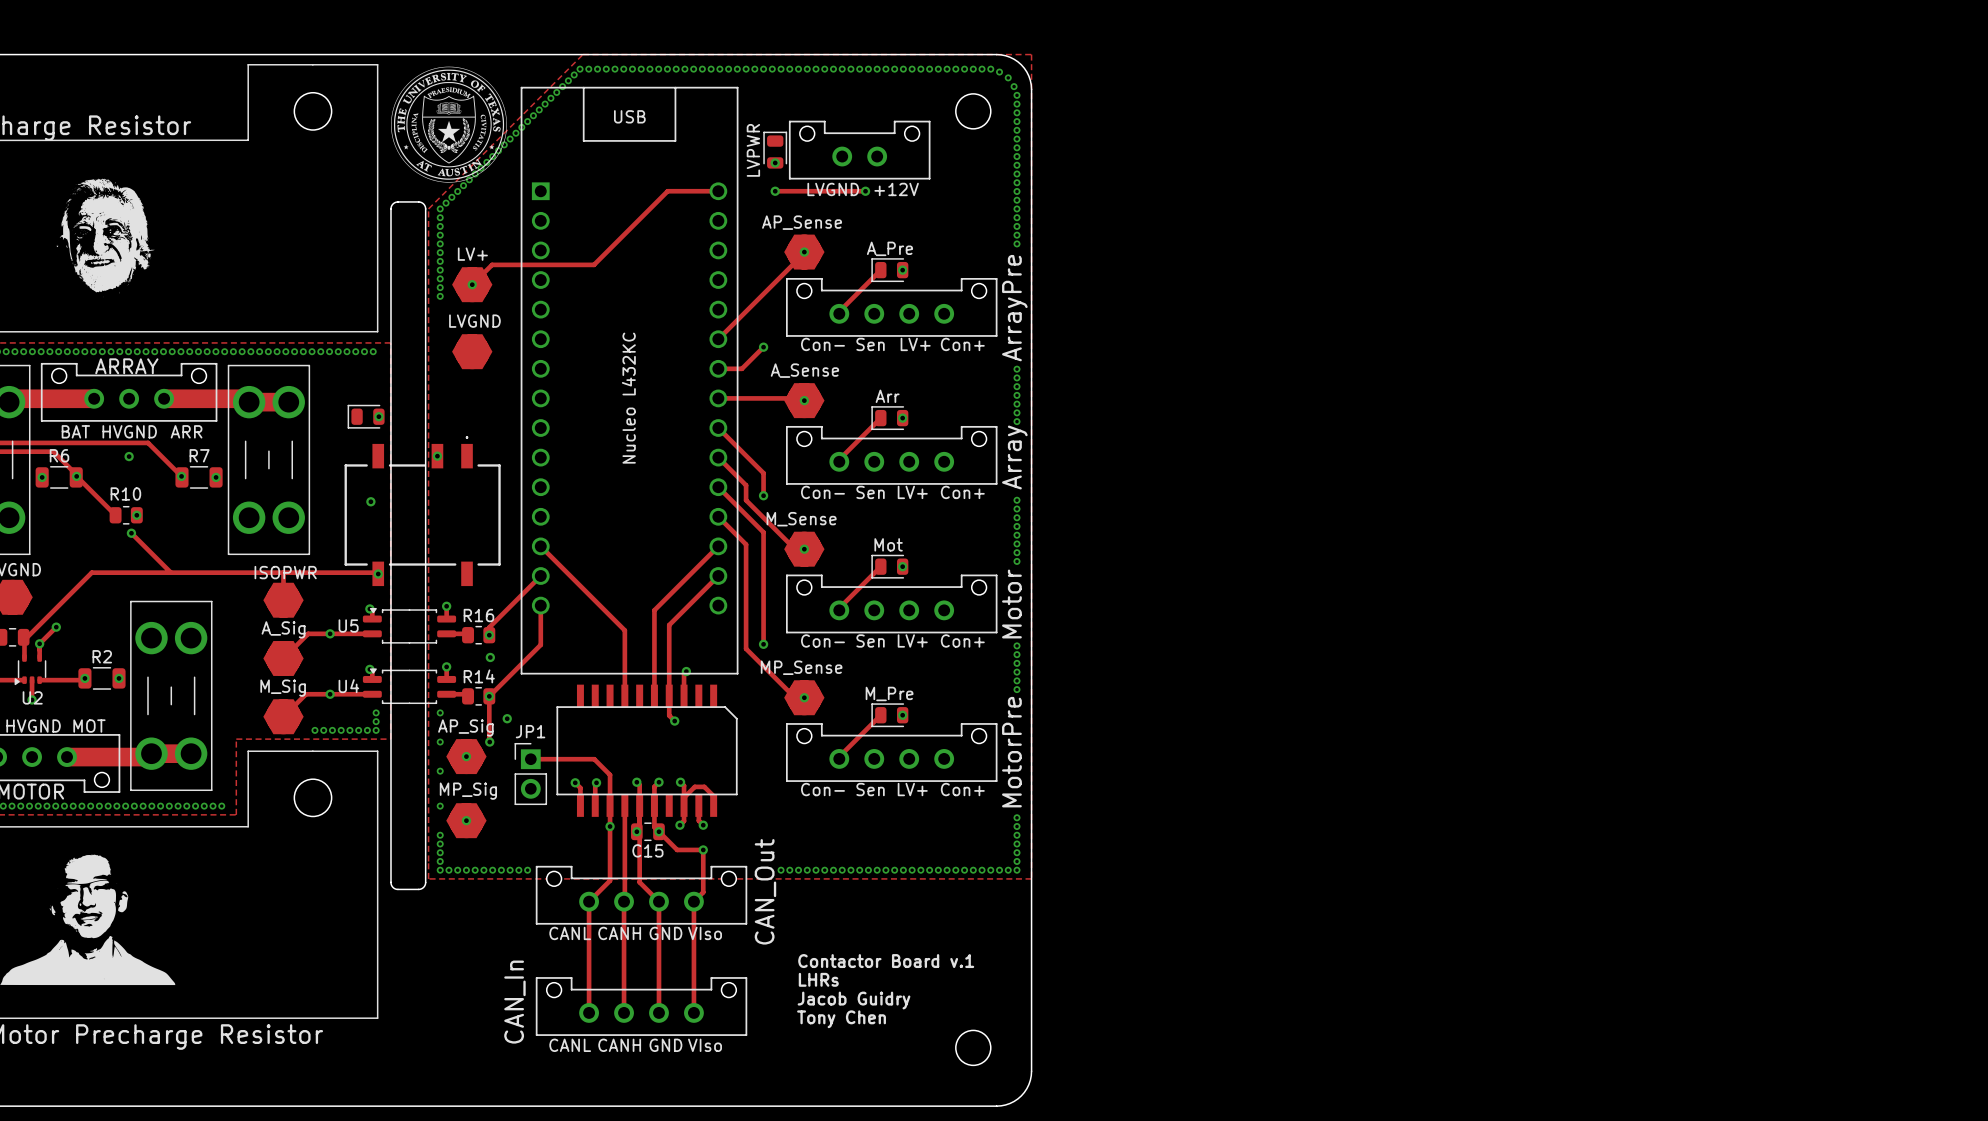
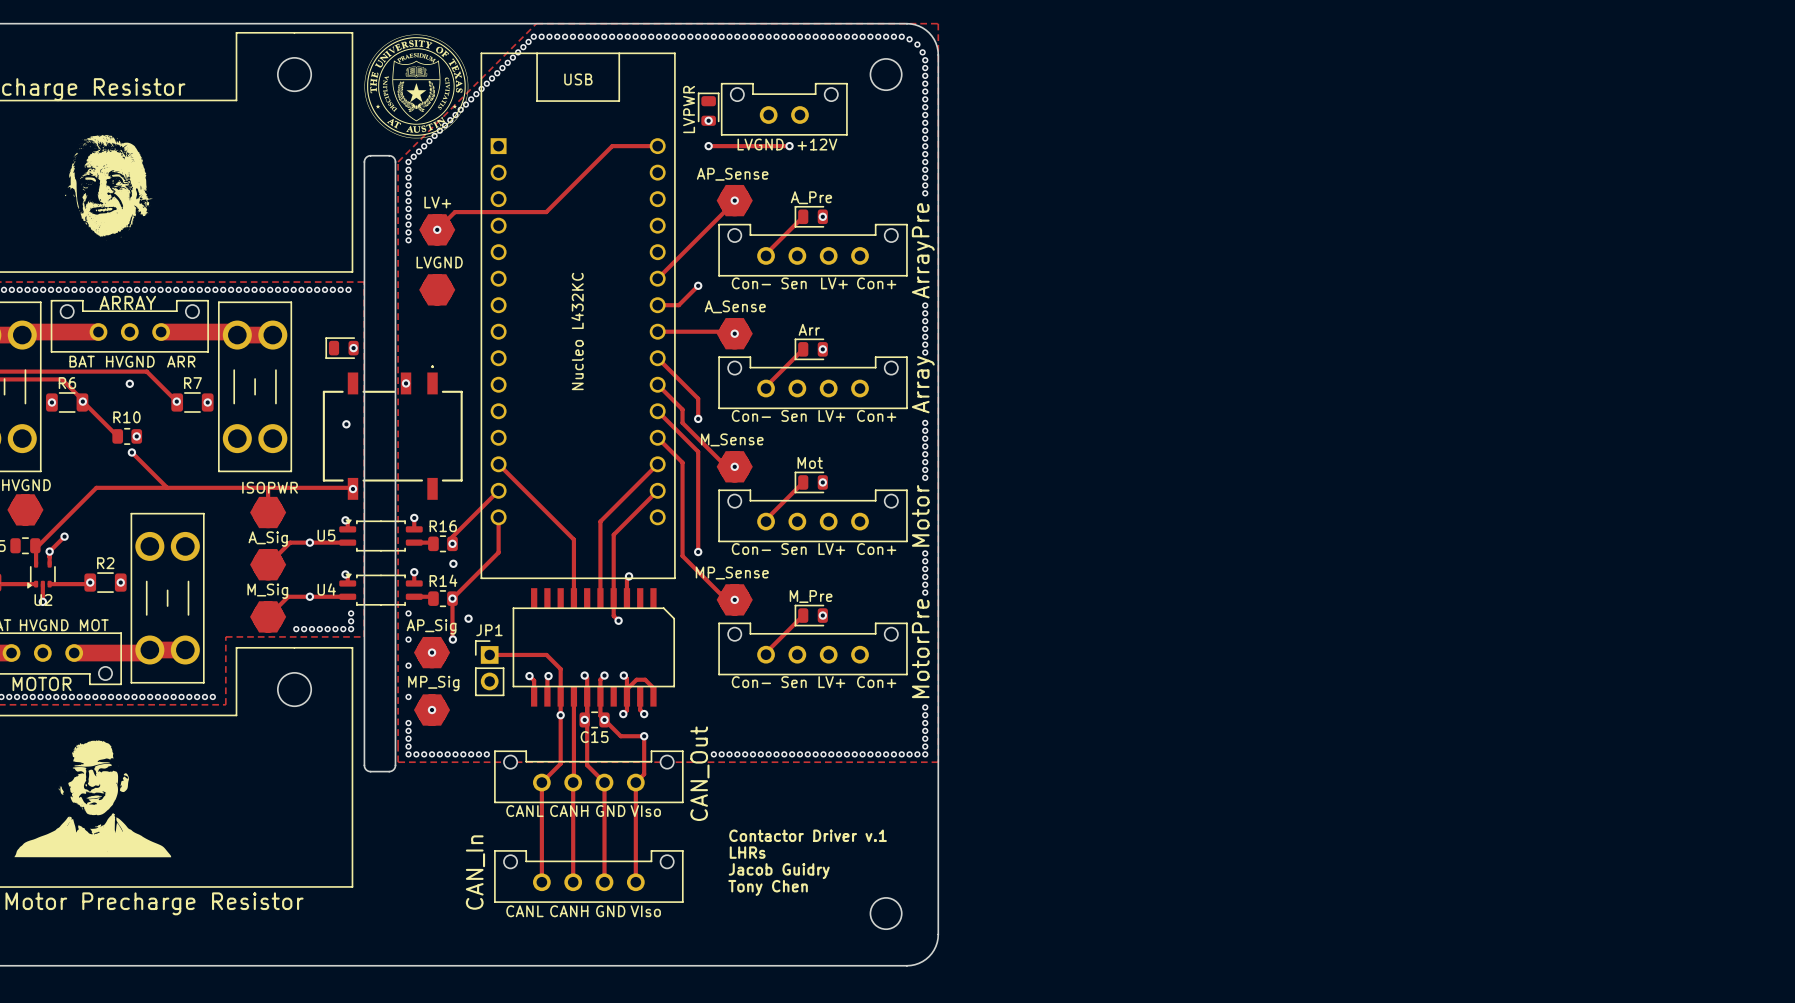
text: Contactor Board v.1 (886, 961) -> Contactor Driver v.1 (808, 835)

